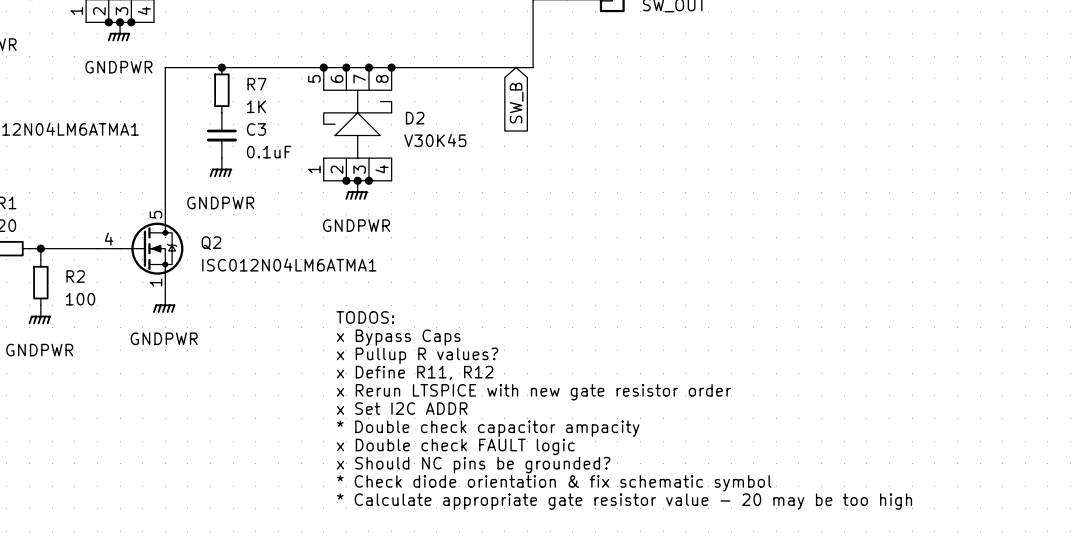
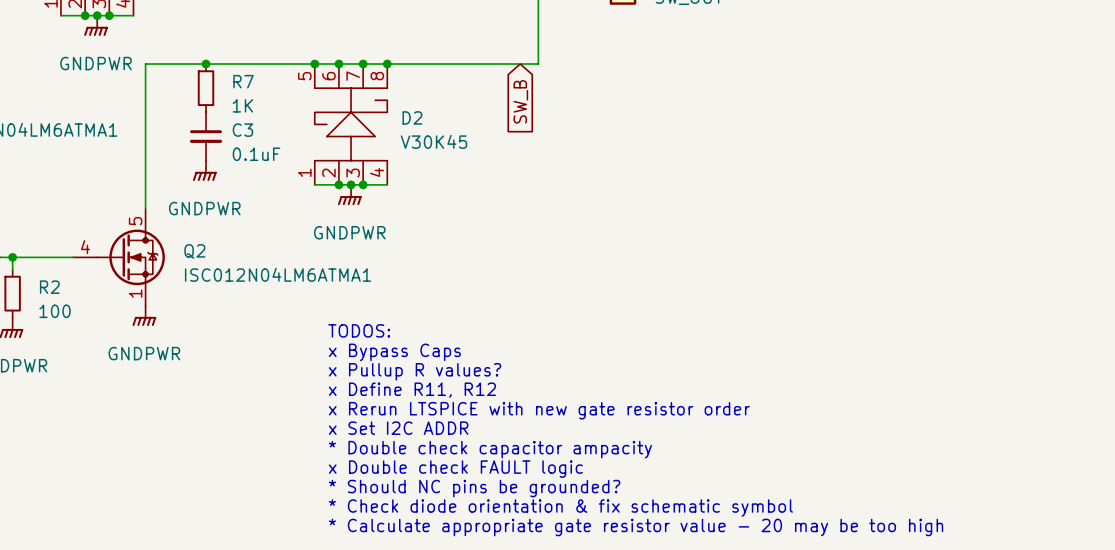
text: x Should NC pins be grounded? (473, 465) -> * Should NC pins be grounded? (474, 488)

